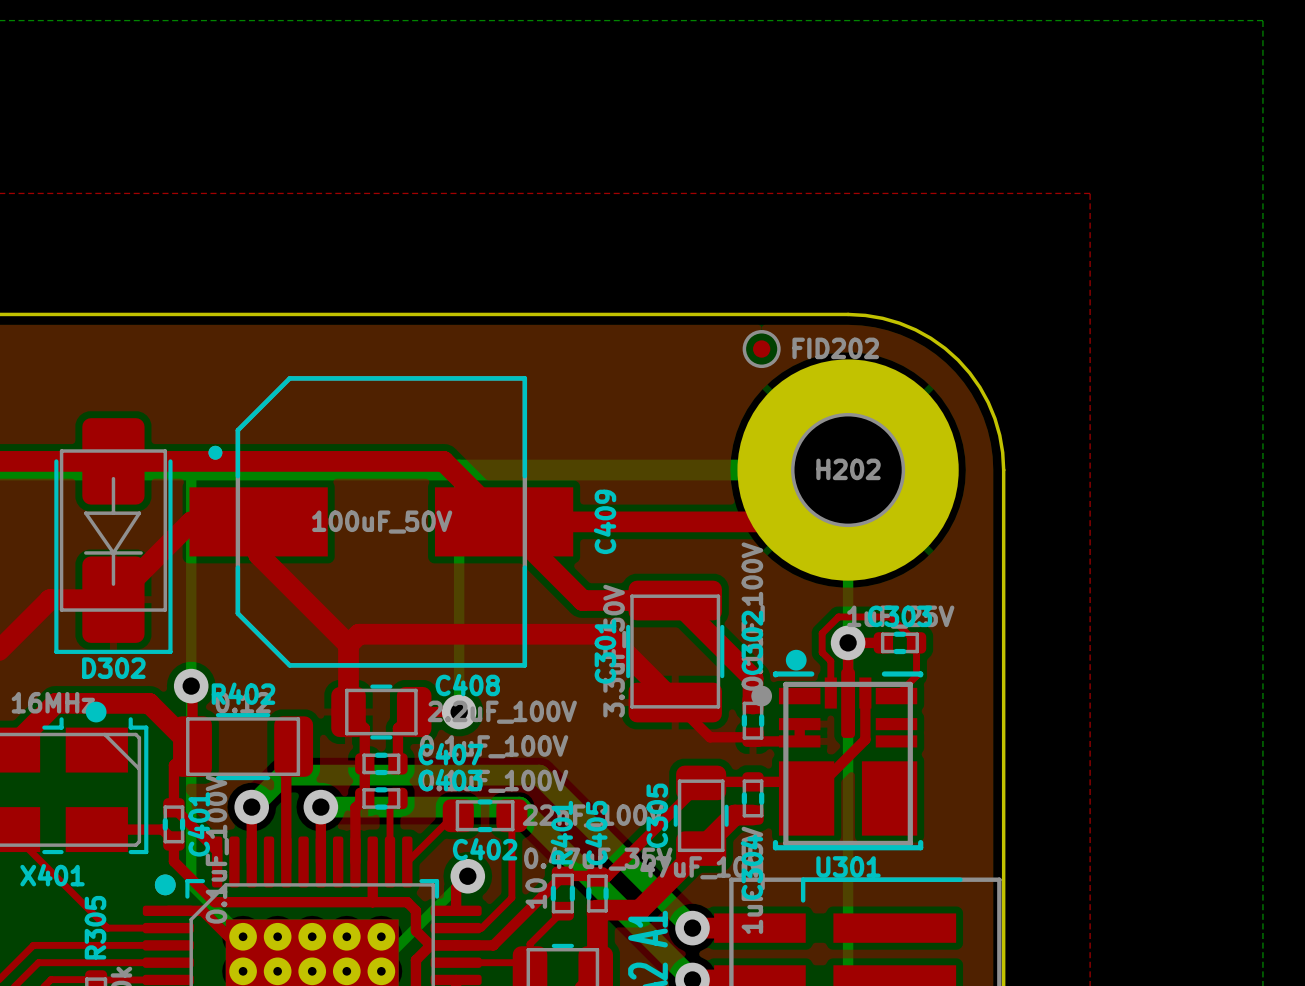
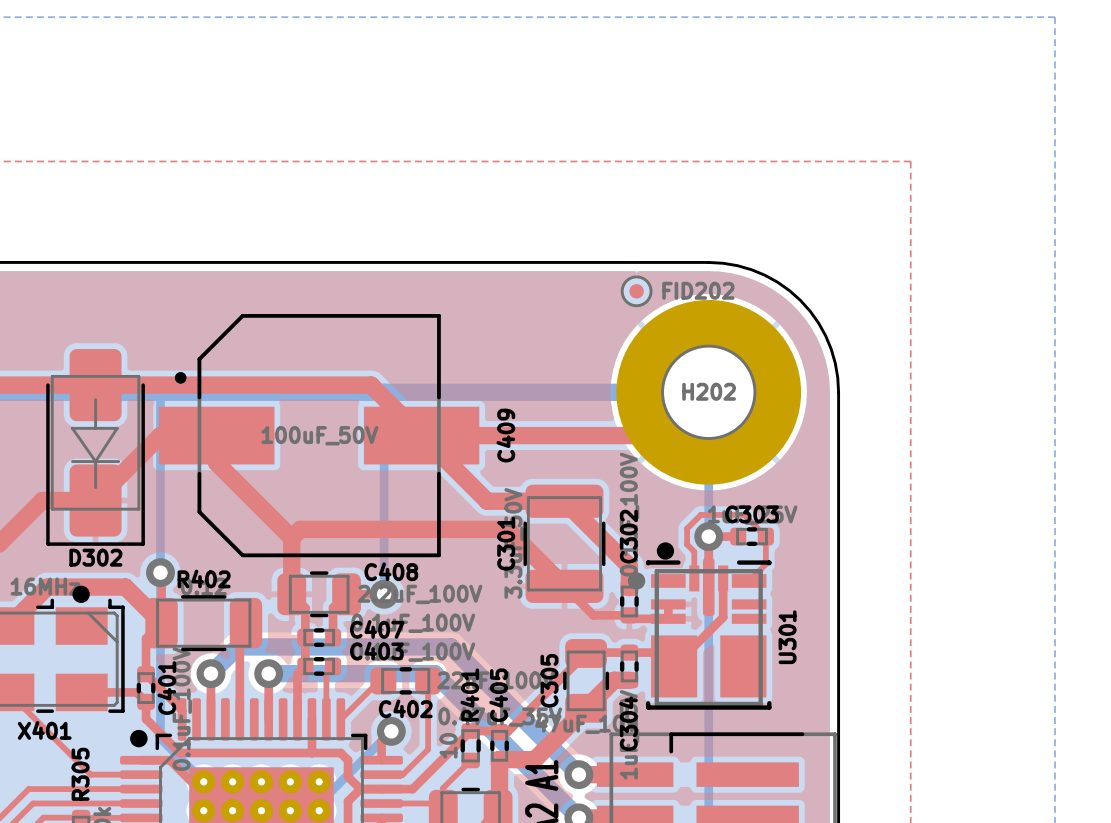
U301 name rotation: 0° (848, 866) -> 90° counterclockwise (787, 637)
U301 name position: U301 (848, 866) -> U301 (787, 637)

